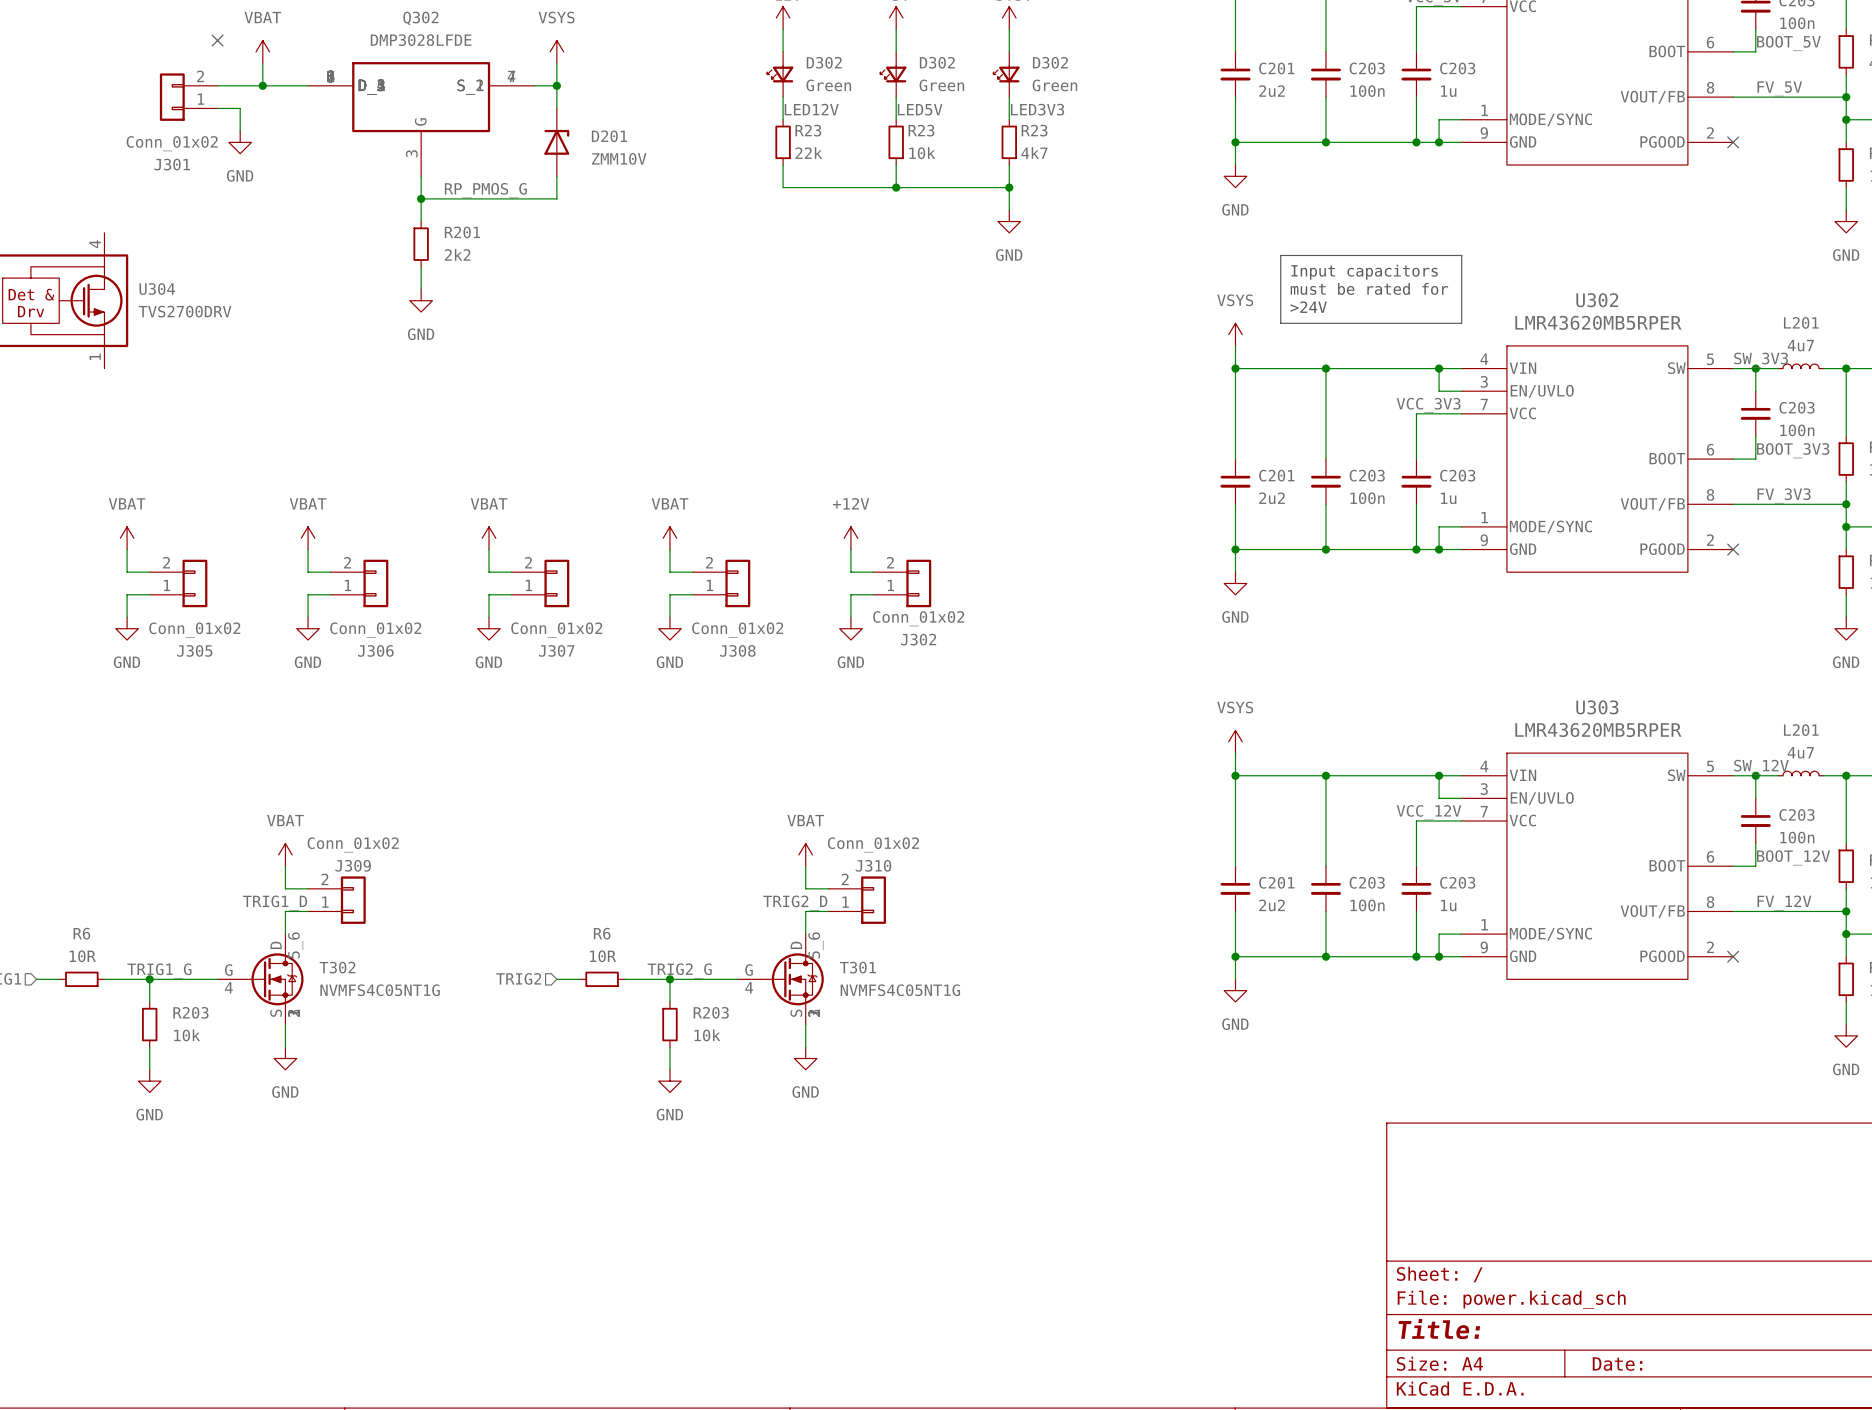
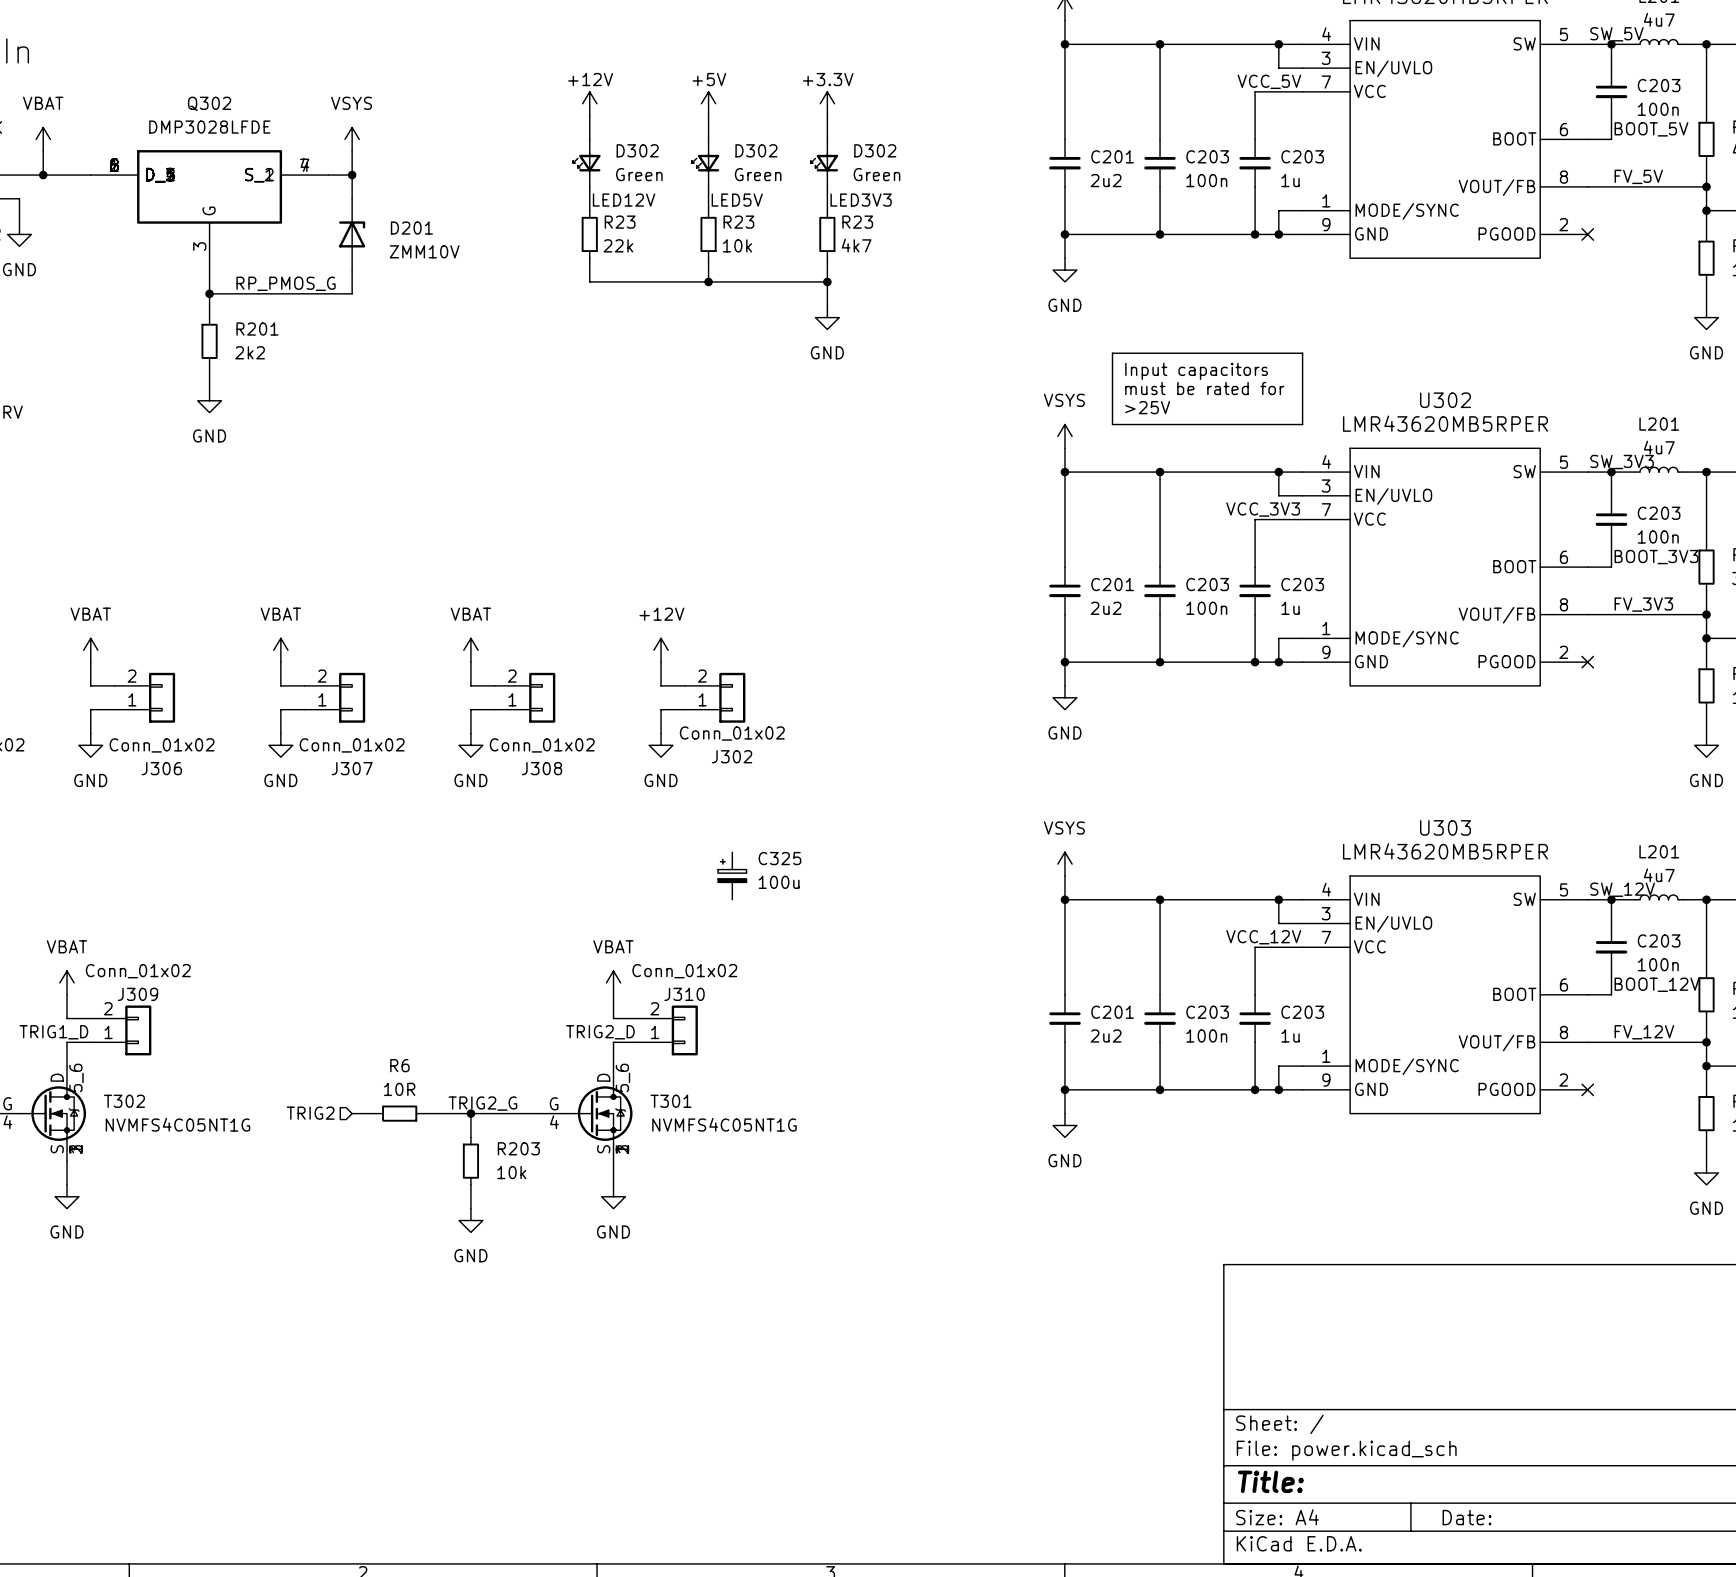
text: >24V (1308, 307) -> >25V (1147, 407)
C325: none -> 100u (732, 875)

